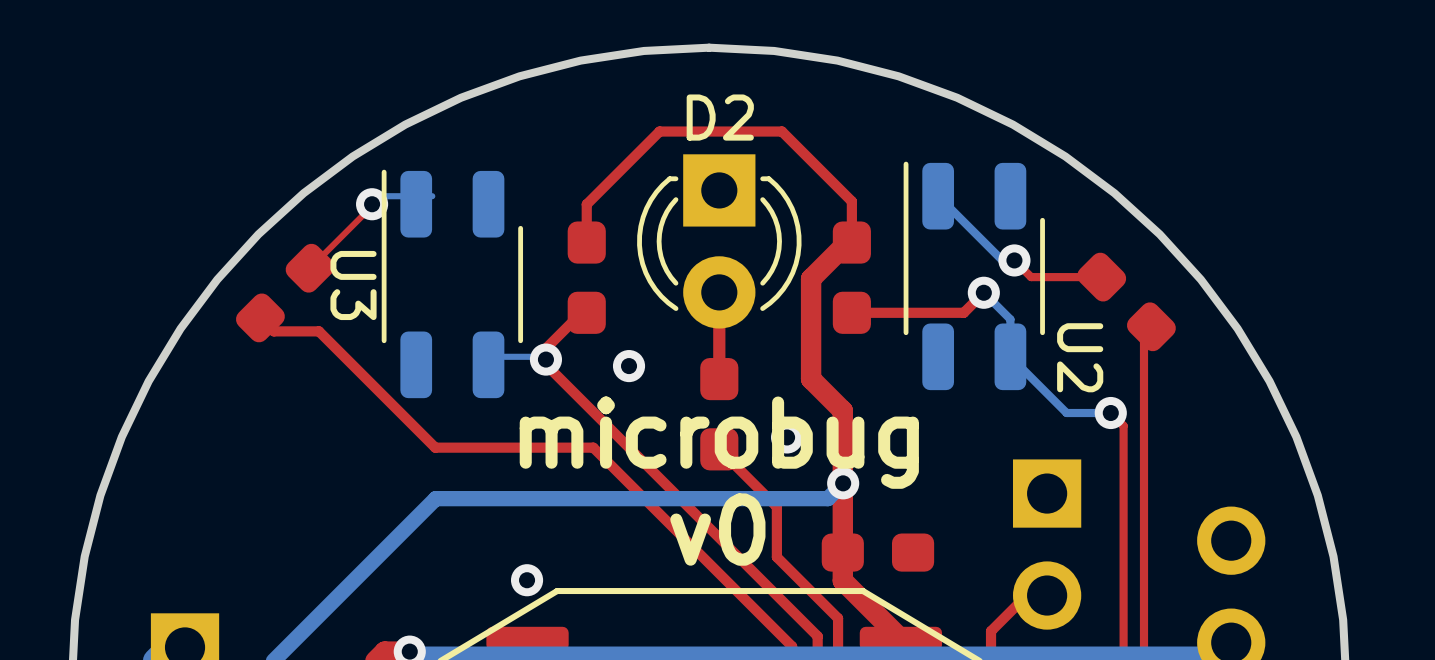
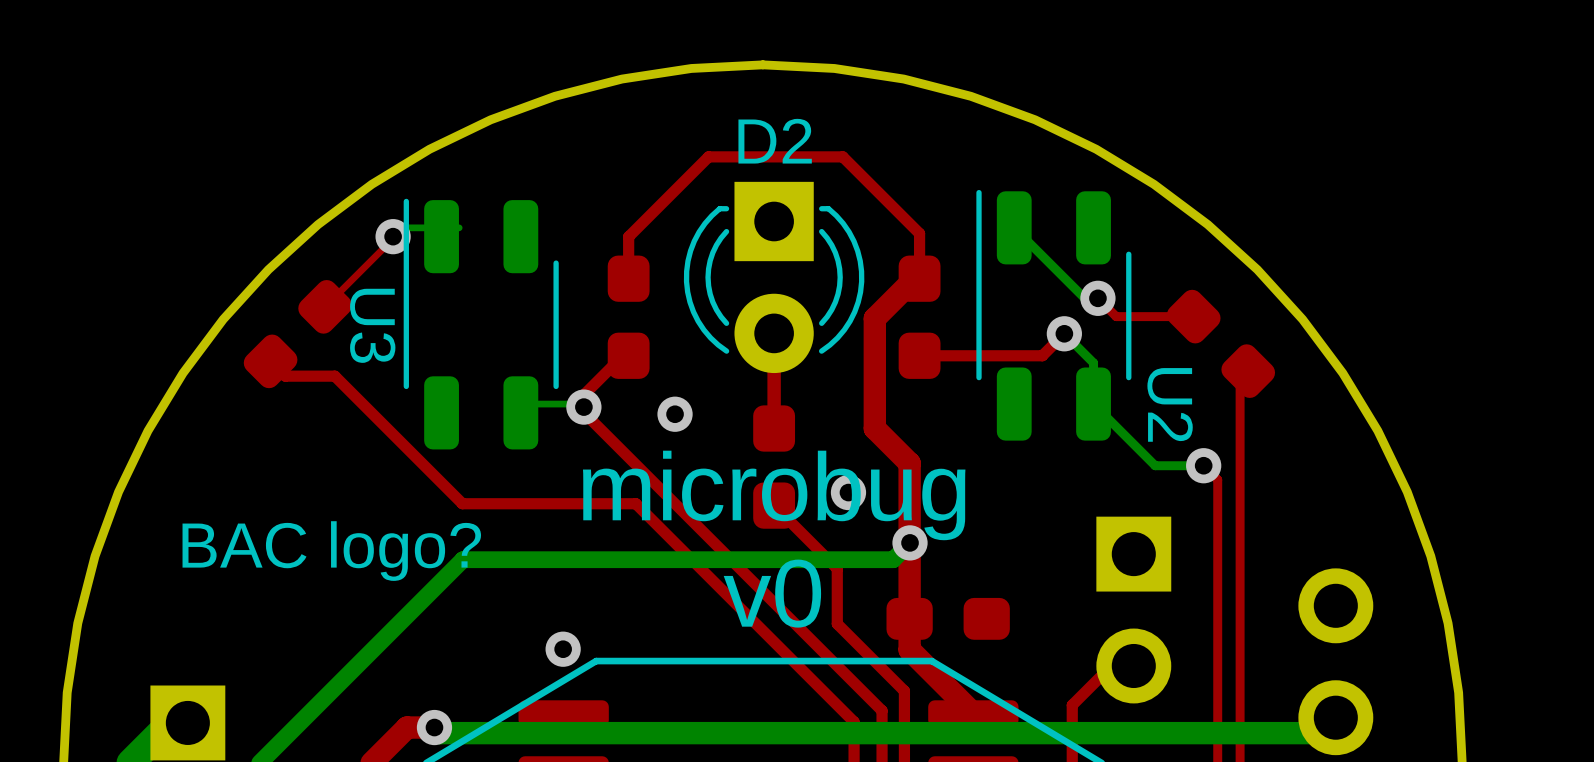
text: none -> BAC logo? (331, 551)

